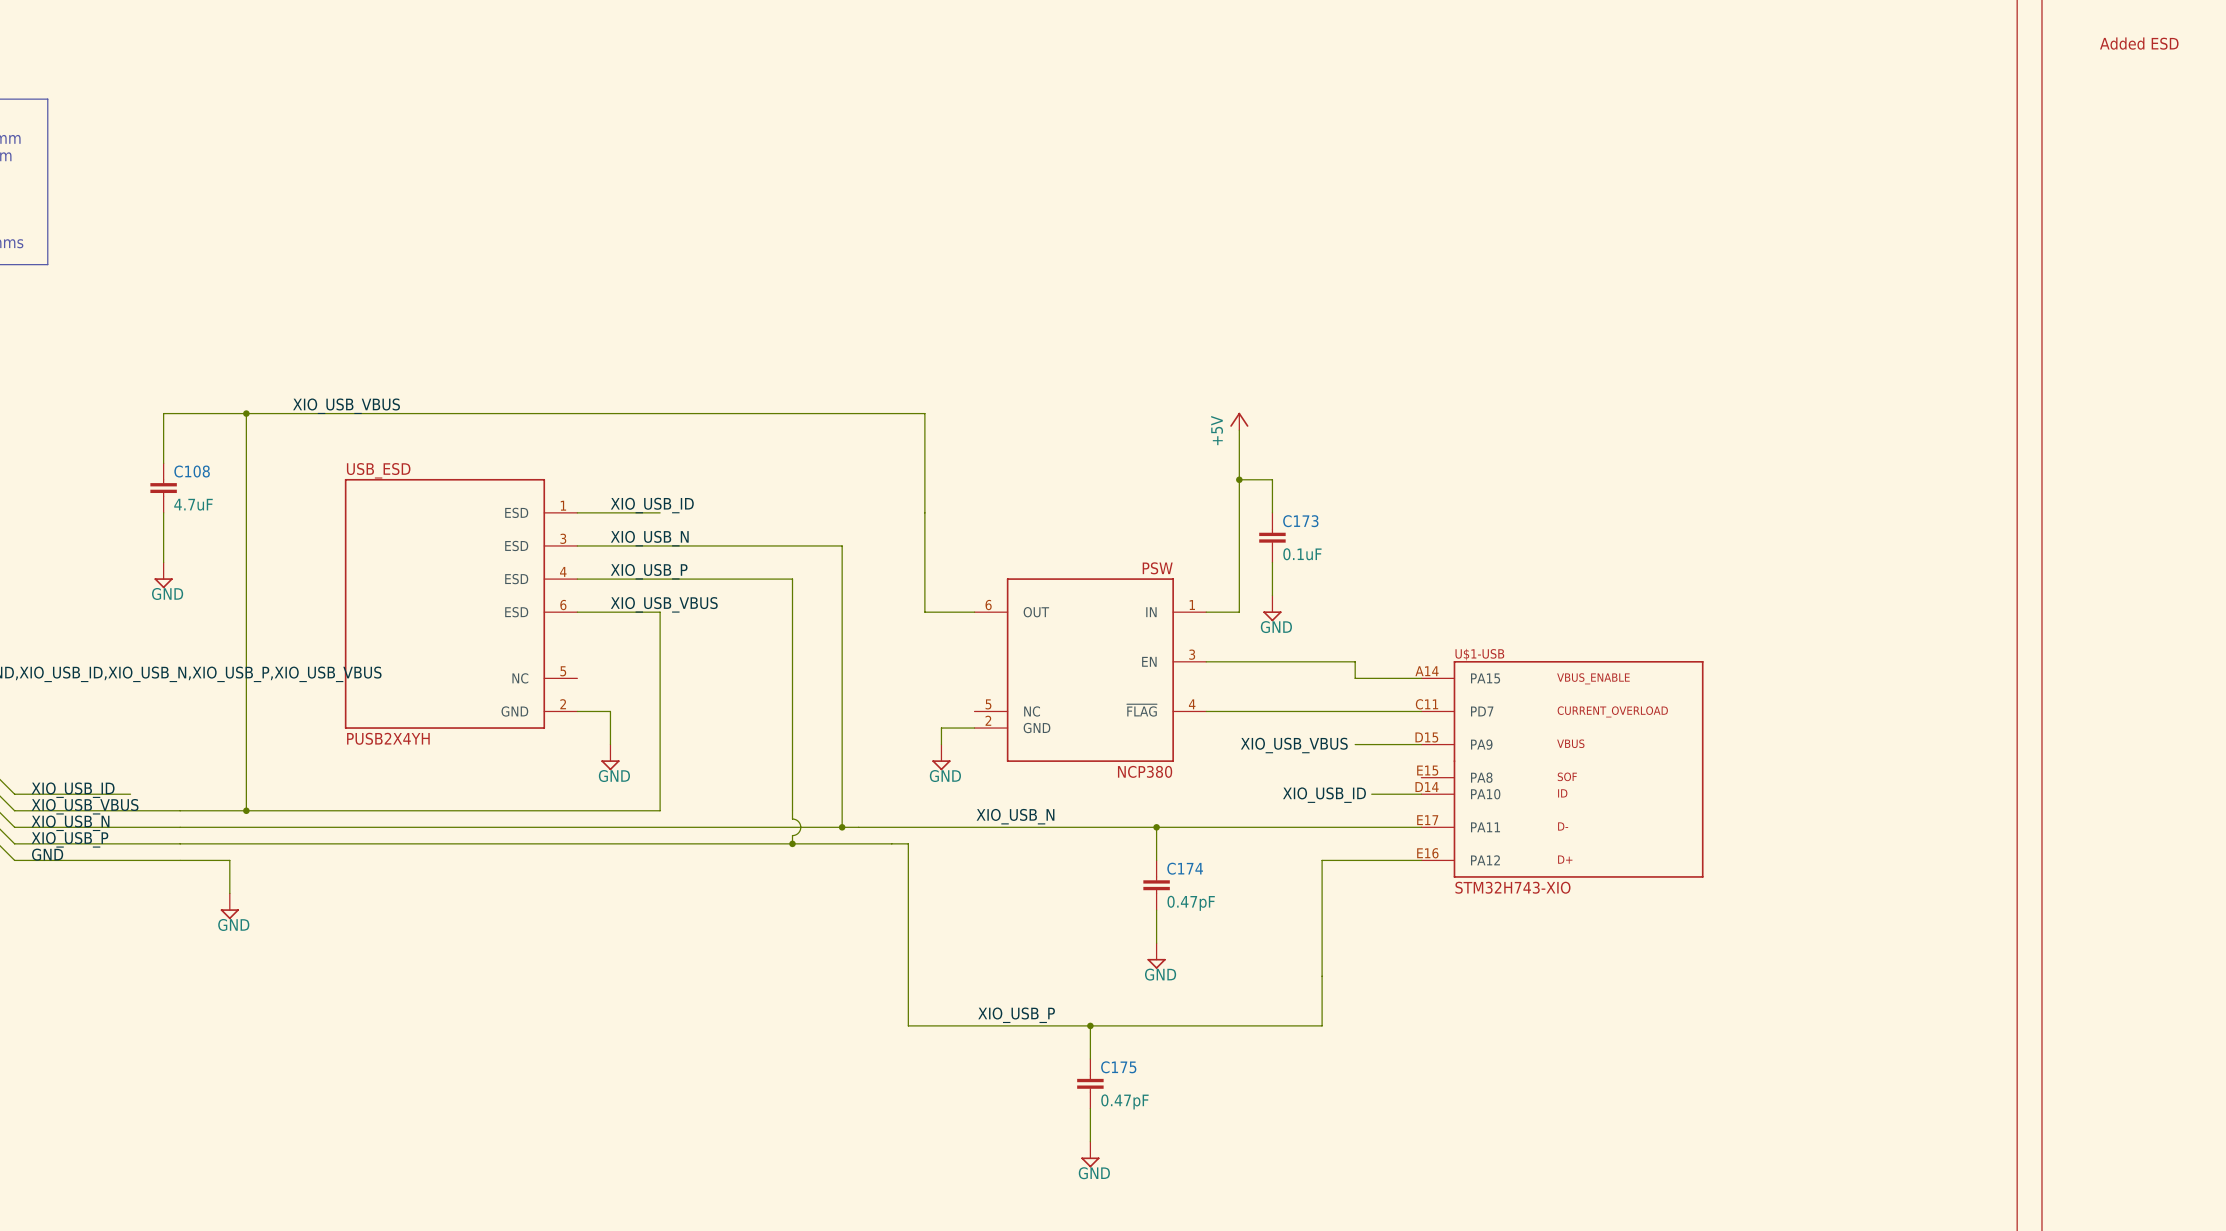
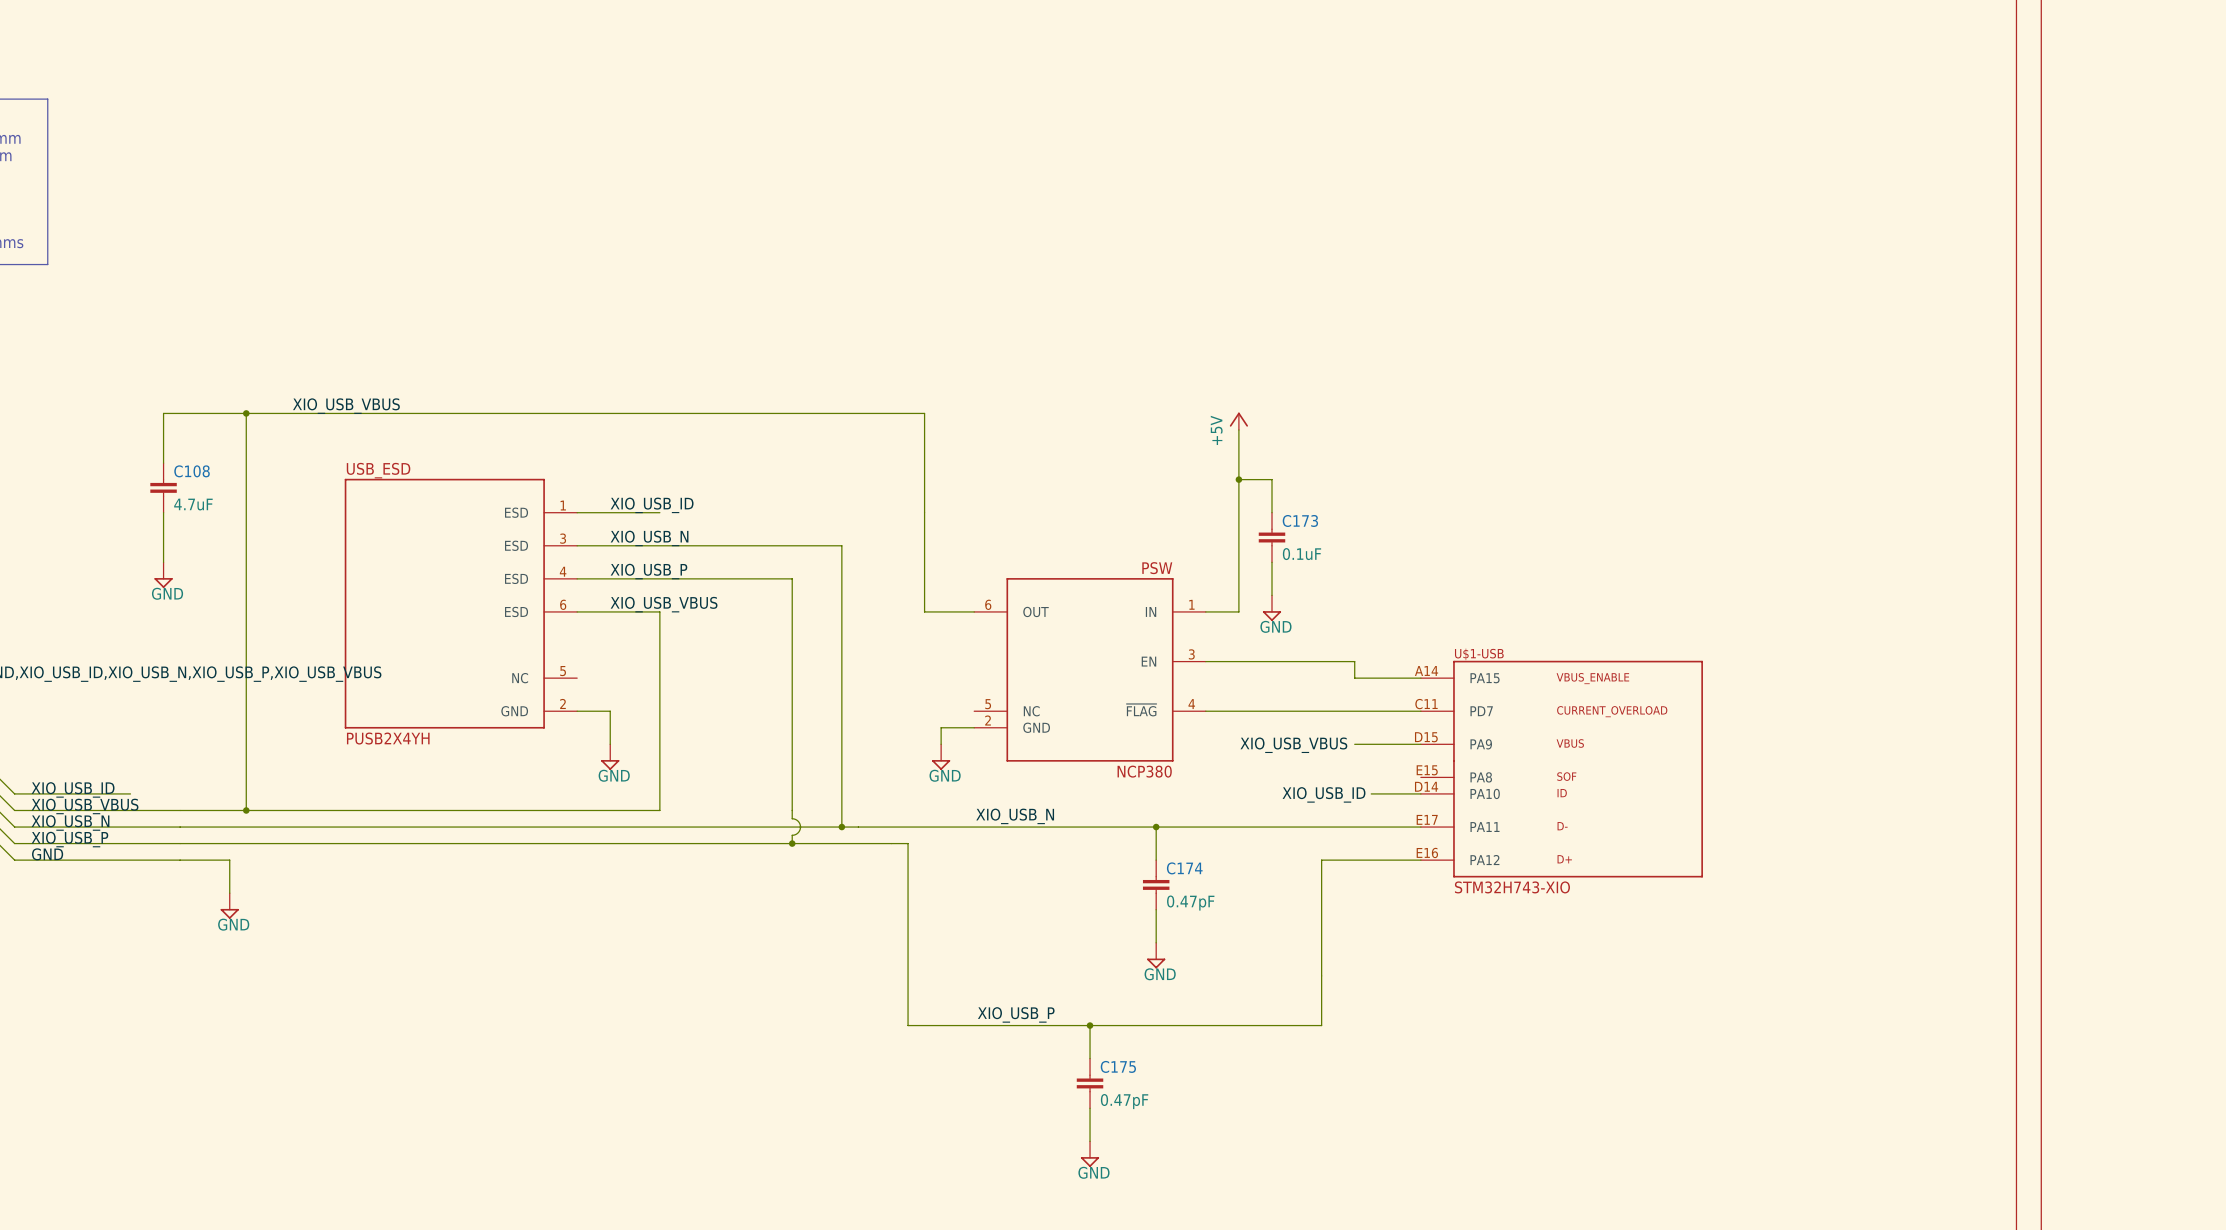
text: Added ESD (2139, 43) -> none

